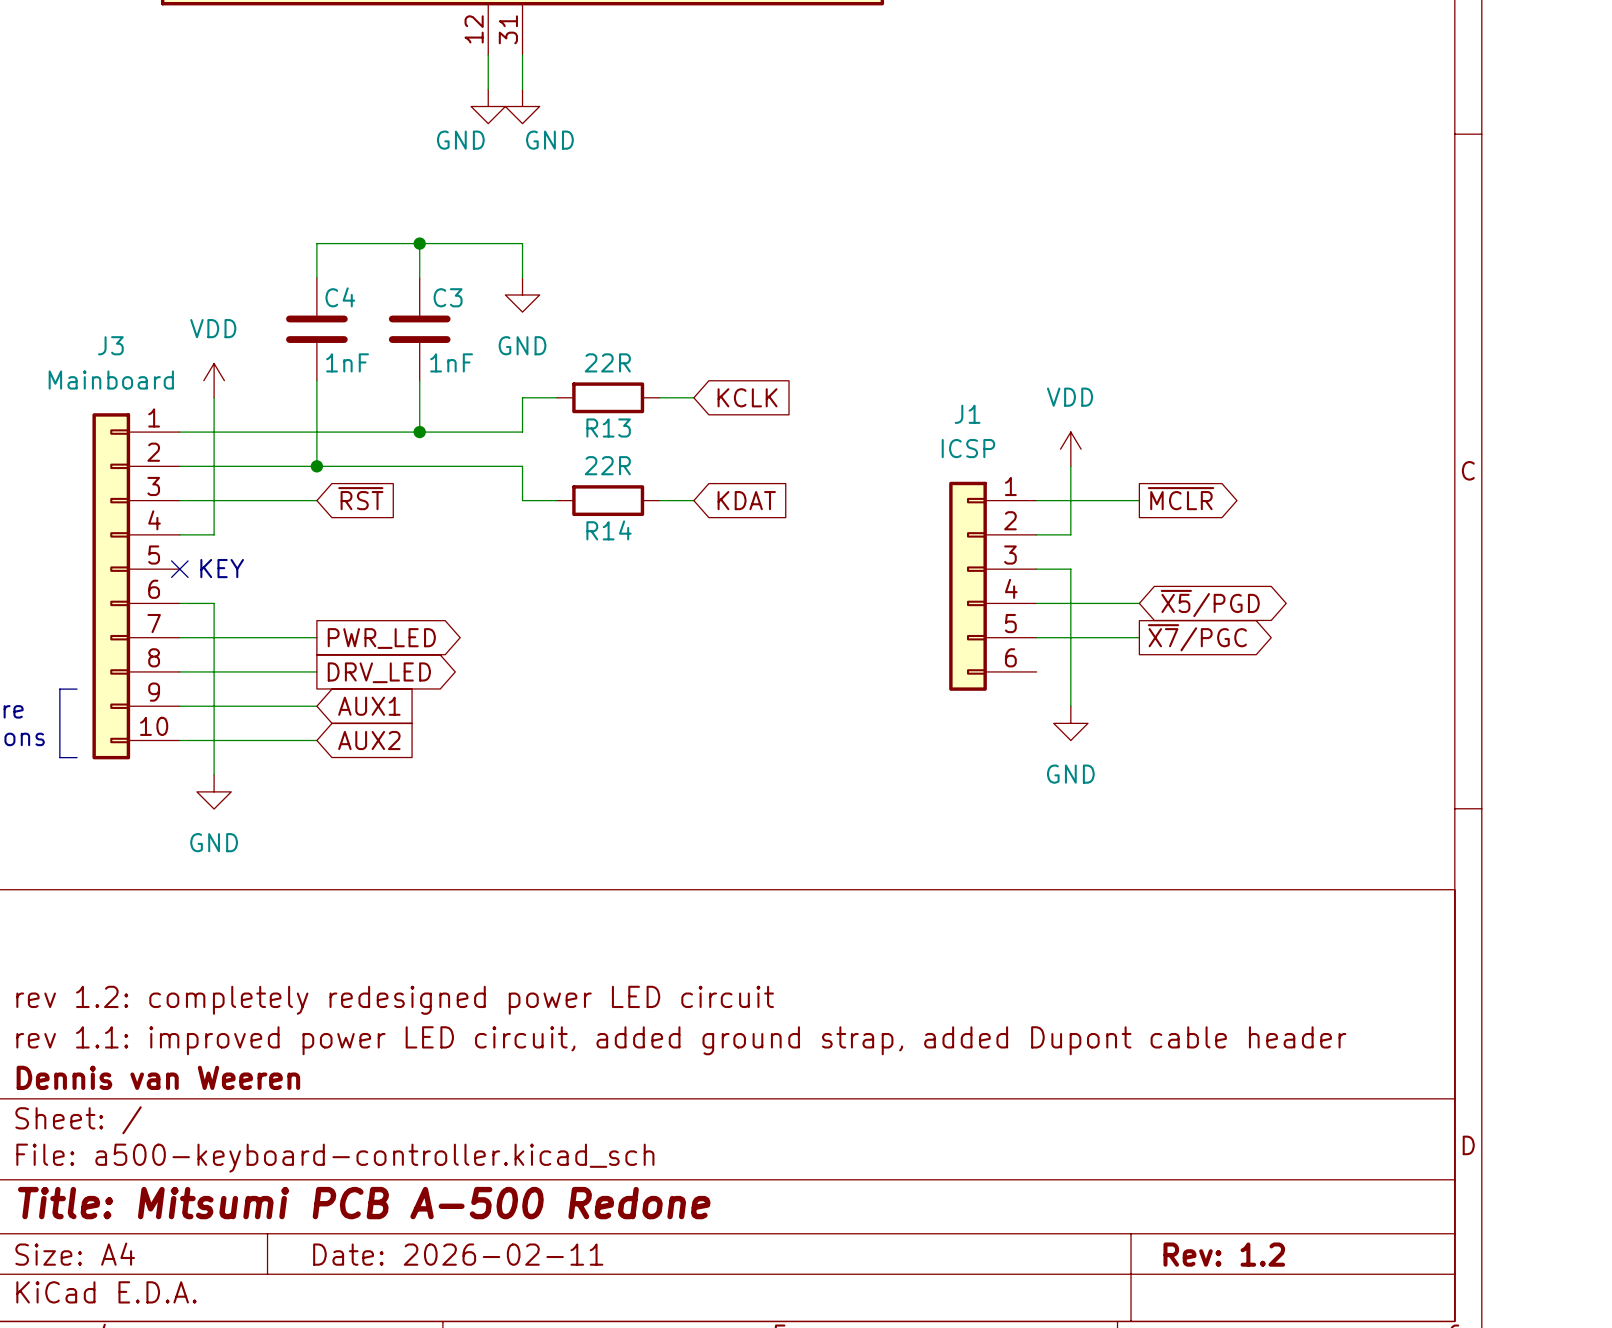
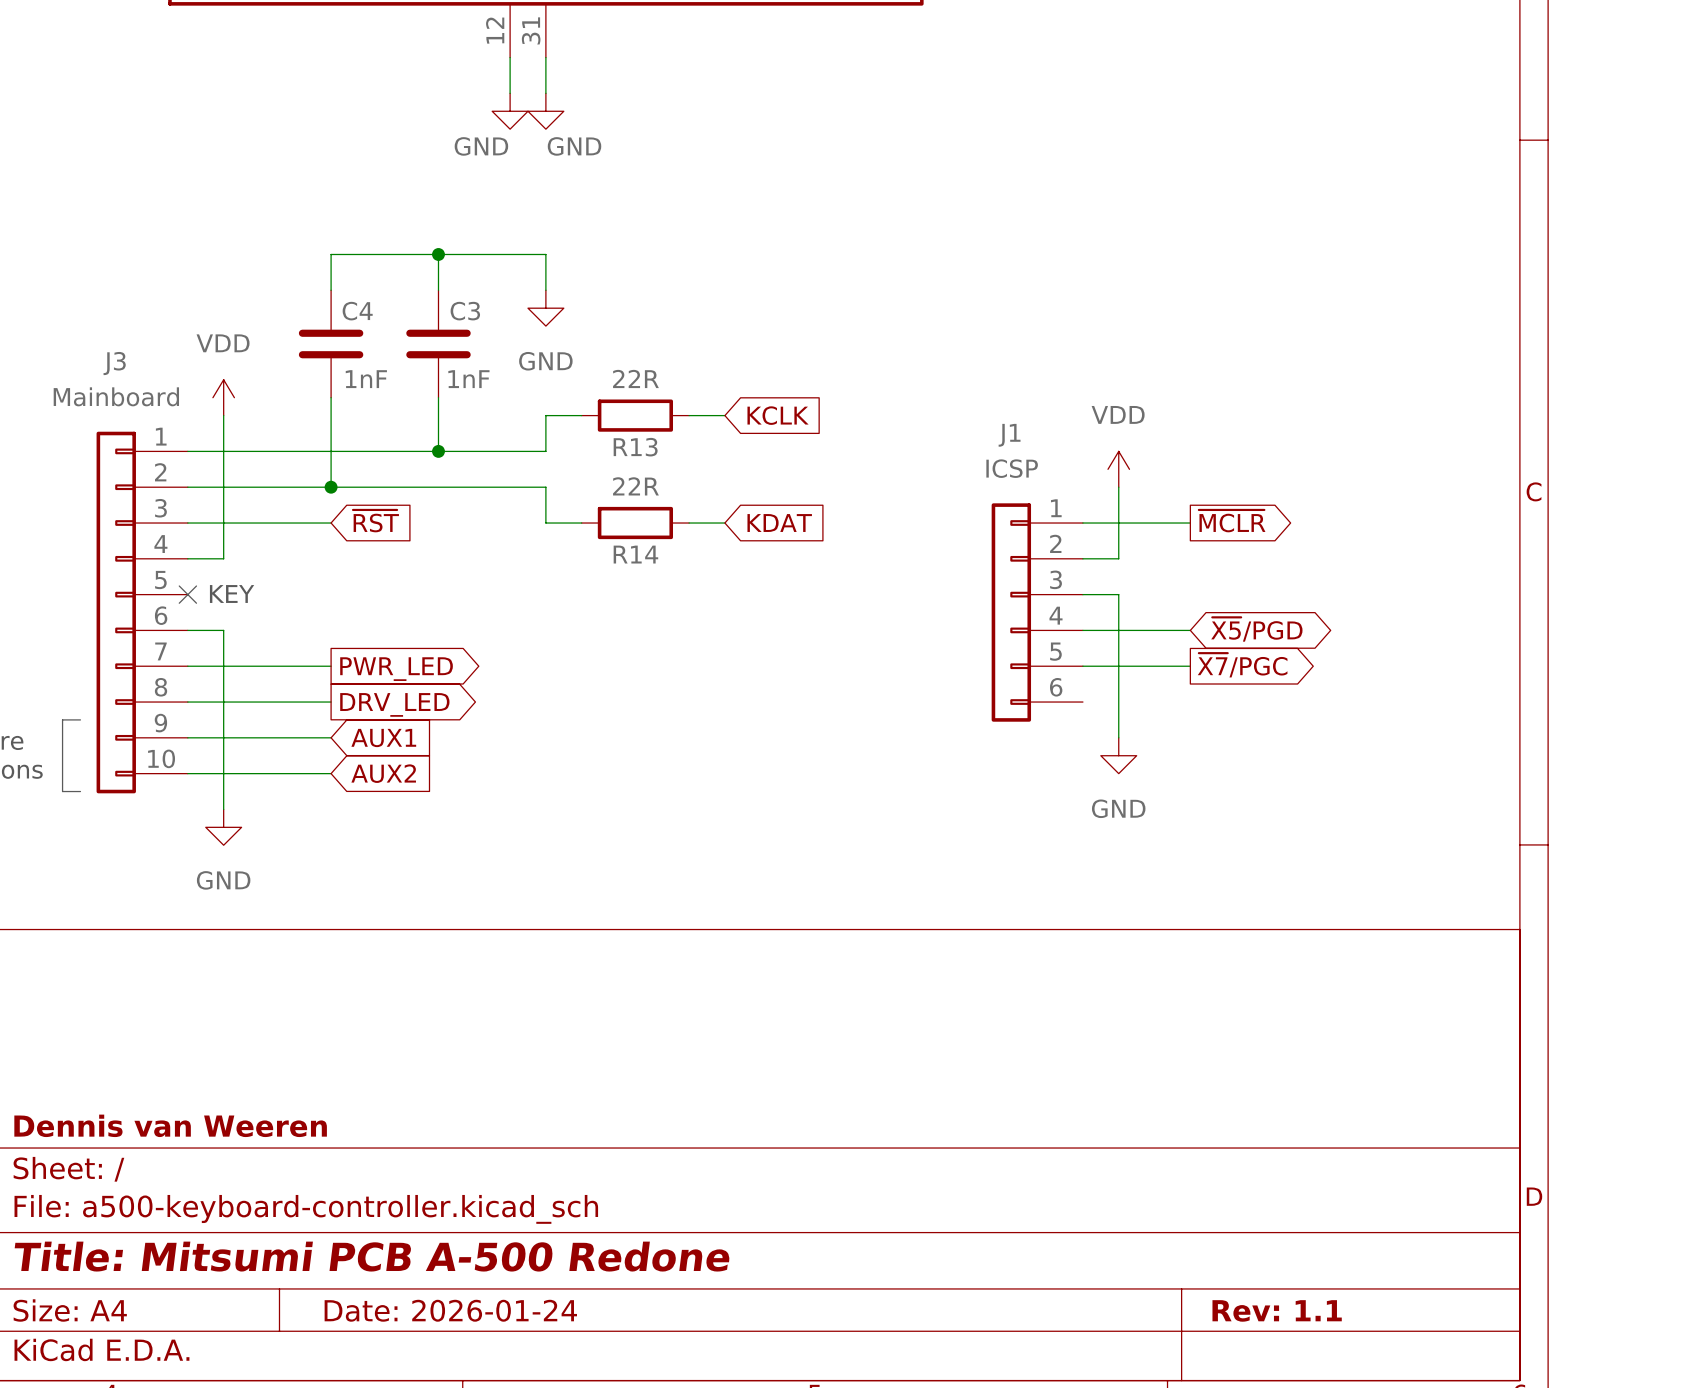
title block: rev 1.2: completely redesigned power LED circuit (395, 1000) -> none
title block: rev 1.1: improved power LED circuit, added ground strap, added Dupont cable header (681, 1040) -> none
title block: Date: 2026-02-11 (458, 1254) -> Date: 2026-01-24 (450, 1310)
title block: Rev: 1.2 (1224, 1254) -> Rev: 1.1 (1277, 1310)

